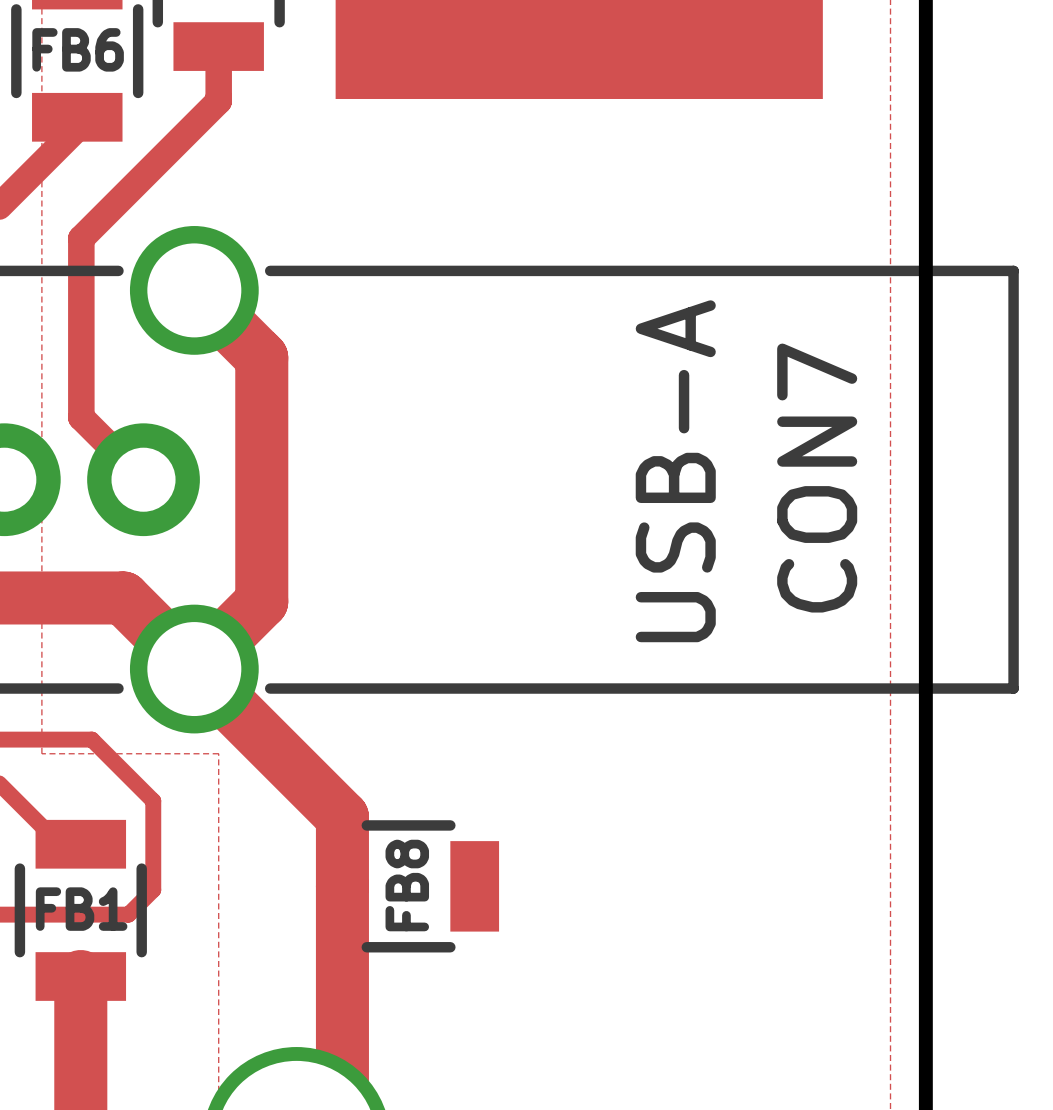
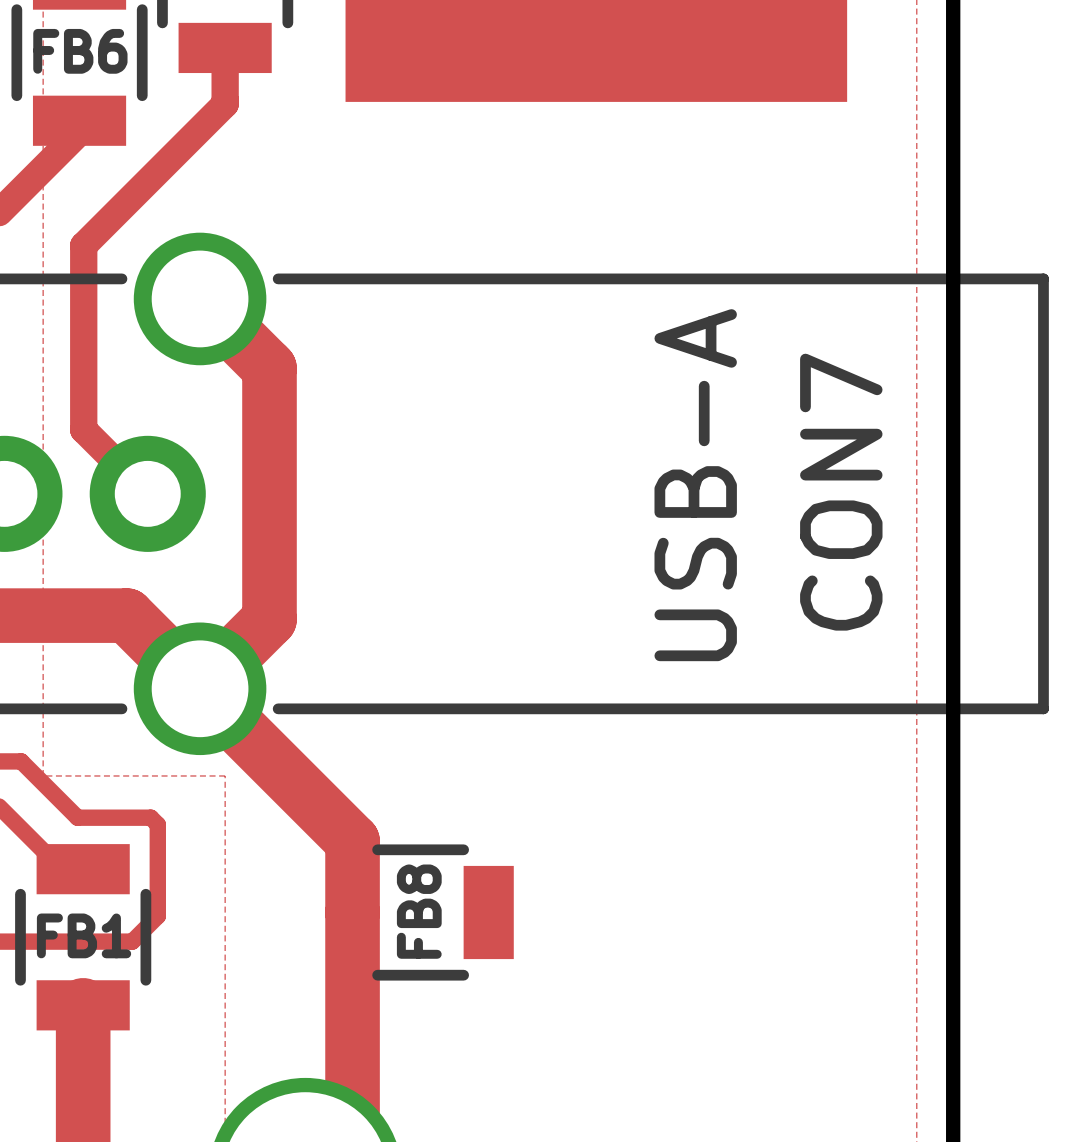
track: (20, 739) (91, 739) (146, 794) -> (21, 761) (77, 817) (150, 817)

